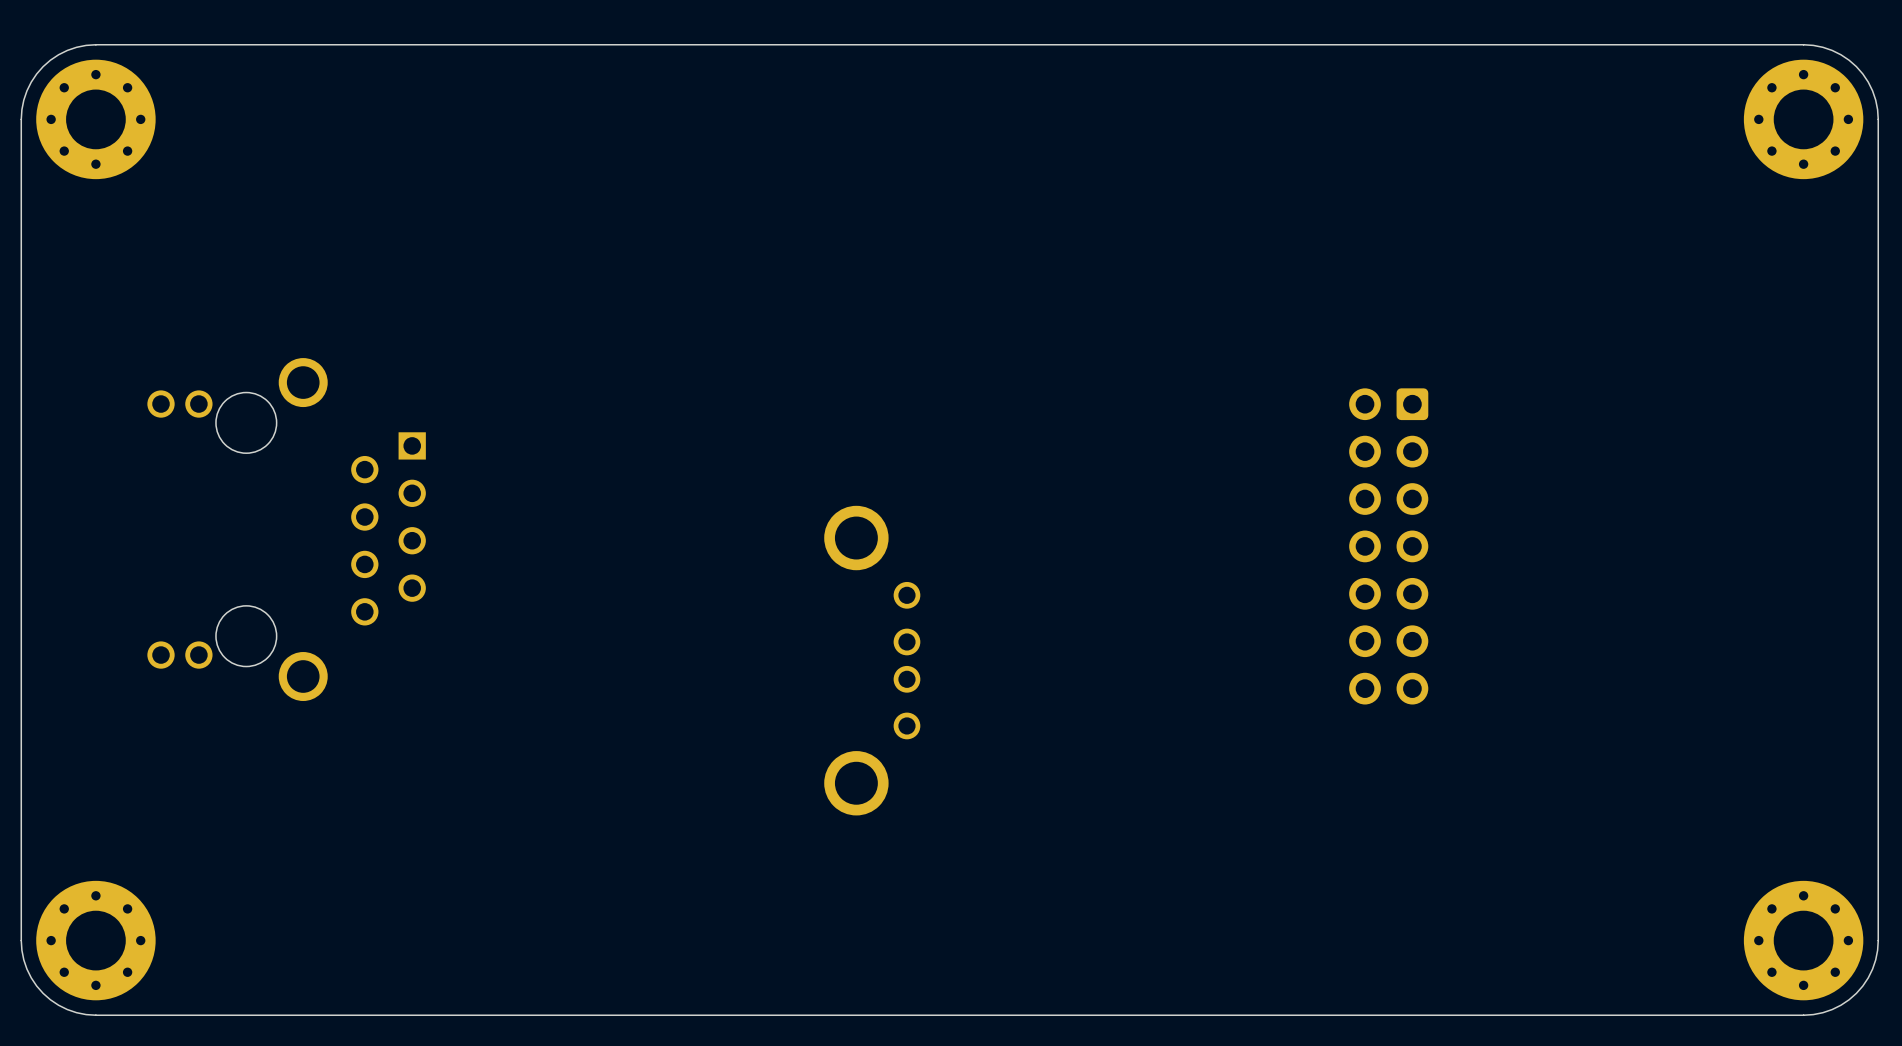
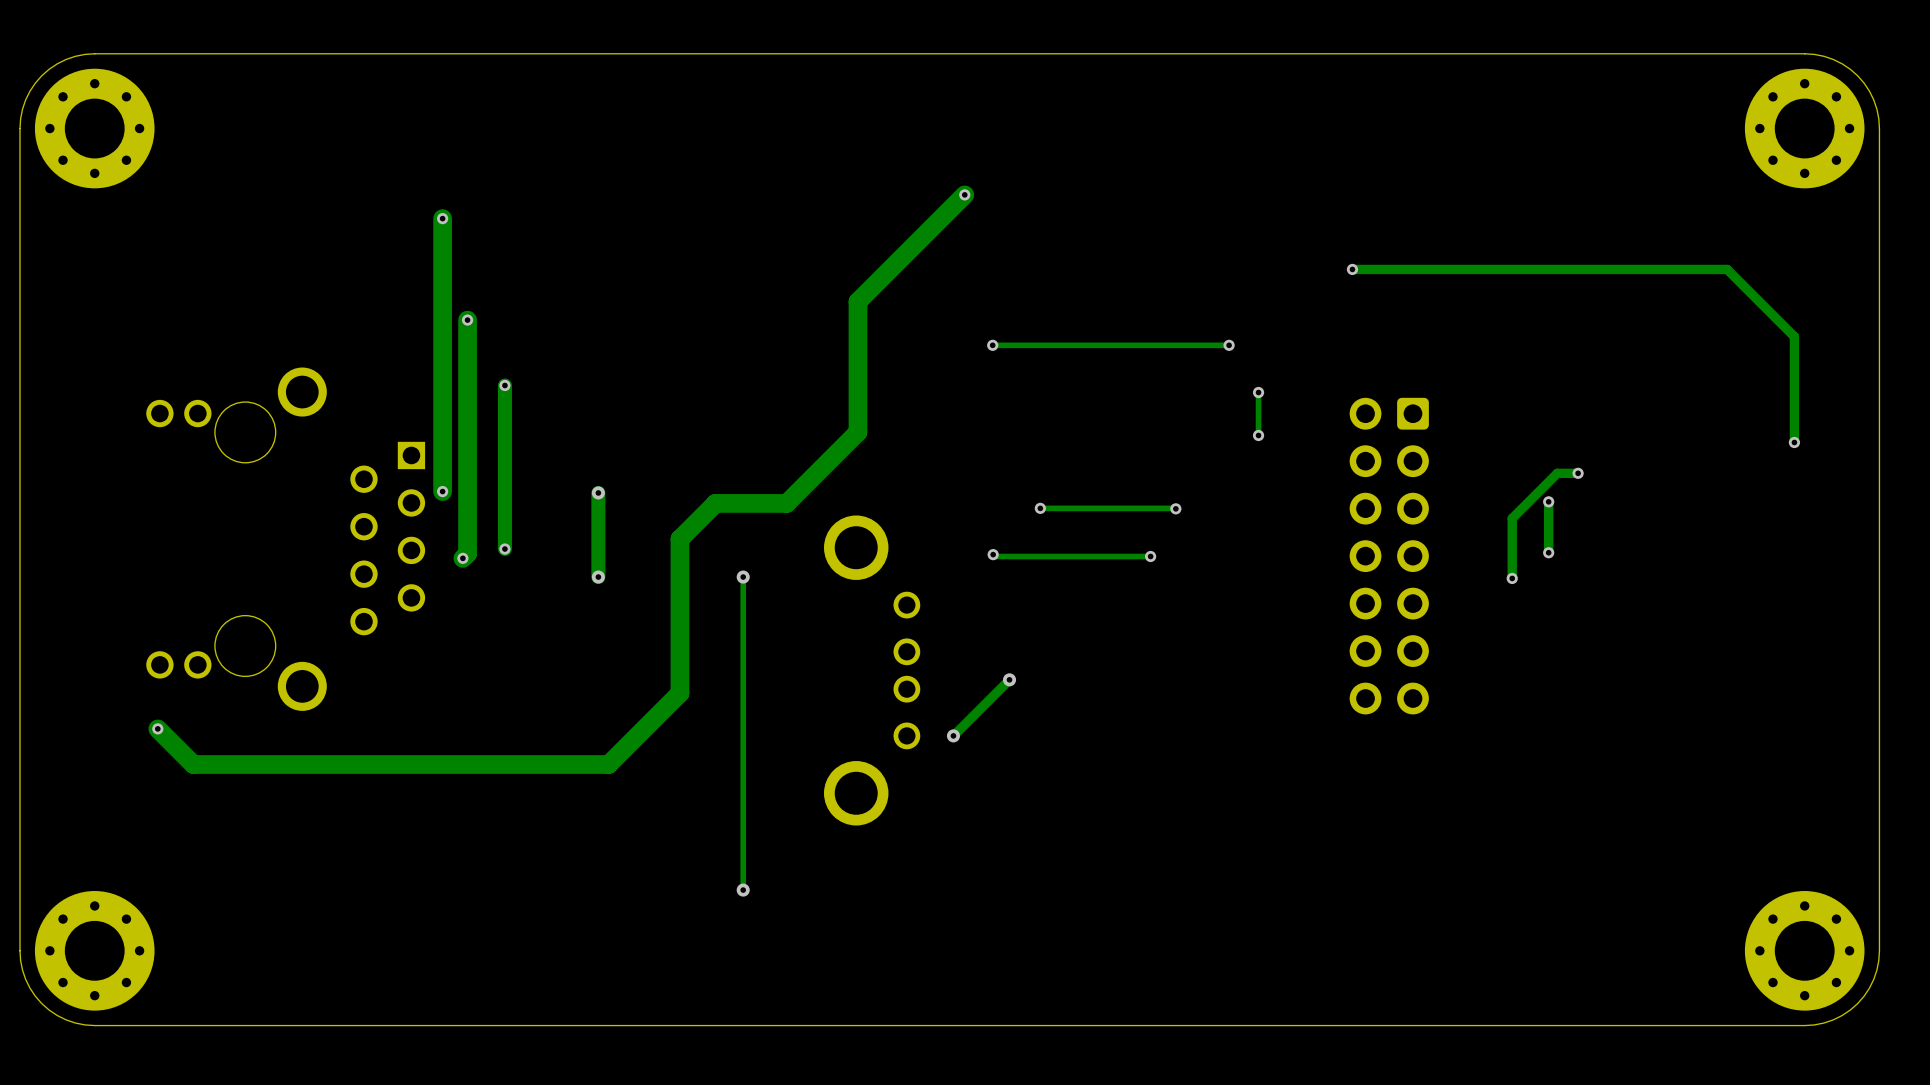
track: none -> (964, 194) (857, 301) (857, 432) (786, 503) (715, 503) (679, 539) (679, 693) (608, 764) (193, 764) (157, 728)
via: none -> (964, 194)
track: none -> (442, 218) (442, 491)
via: none -> (442, 218)
track: none -> (1352, 269) (1727, 269) (1794, 336) (1794, 442)
via: none -> (1352, 269)
track: none -> (467, 320) (467, 553) (462, 558)
via: none -> (467, 320)
via: none -> (992, 345)
track: none -> (1229, 345) (992, 345)
via: none -> (1229, 345)
track: none -> (504, 385) (504, 549)
via: none -> (504, 385)
track: none -> (1258, 392) (1258, 435)
via: none -> (1258, 392)
via: none -> (1258, 435)
via: none -> (1794, 442)
track: none -> (1578, 473) (1557, 473) (1512, 518) (1512, 578)
via: none -> (1578, 473)
via: none -> (442, 491)
track: none -> (598, 492) (598, 577)
via: none -> (598, 492)
track: none -> (1548, 501) (1548, 552)
via: none -> (1548, 501)
track: none -> (1040, 508) (1175, 508)
via: none -> (1040, 508)
via: none -> (1175, 508)
via: none -> (504, 549)
via: none -> (1548, 552)
track: none -> (993, 554) (995, 556) (1150, 556)
via: none -> (993, 554)
via: none -> (1150, 556)
via: none -> (462, 558)
via: none -> (598, 577)
track: none -> (743, 577) (743, 890)
via: none -> (743, 577)
via: none -> (1512, 578)
track: none -> (1009, 679) (953, 735)
via: none -> (1009, 679)
via: none -> (157, 728)
via: none -> (953, 735)
via: none -> (743, 890)

